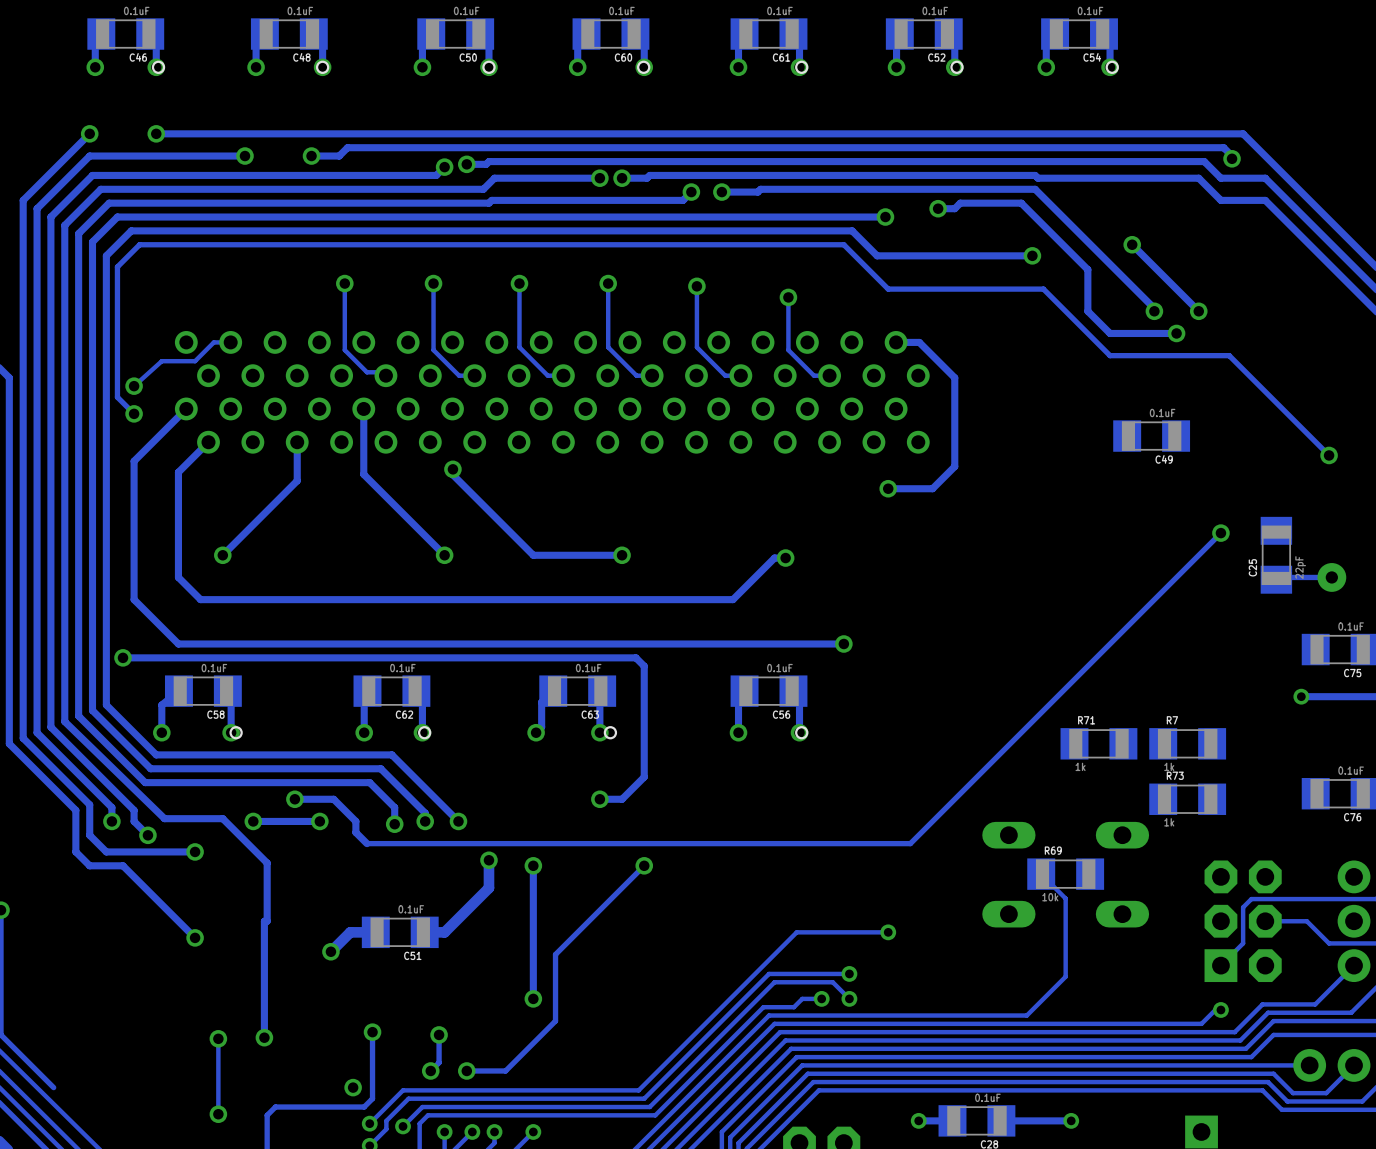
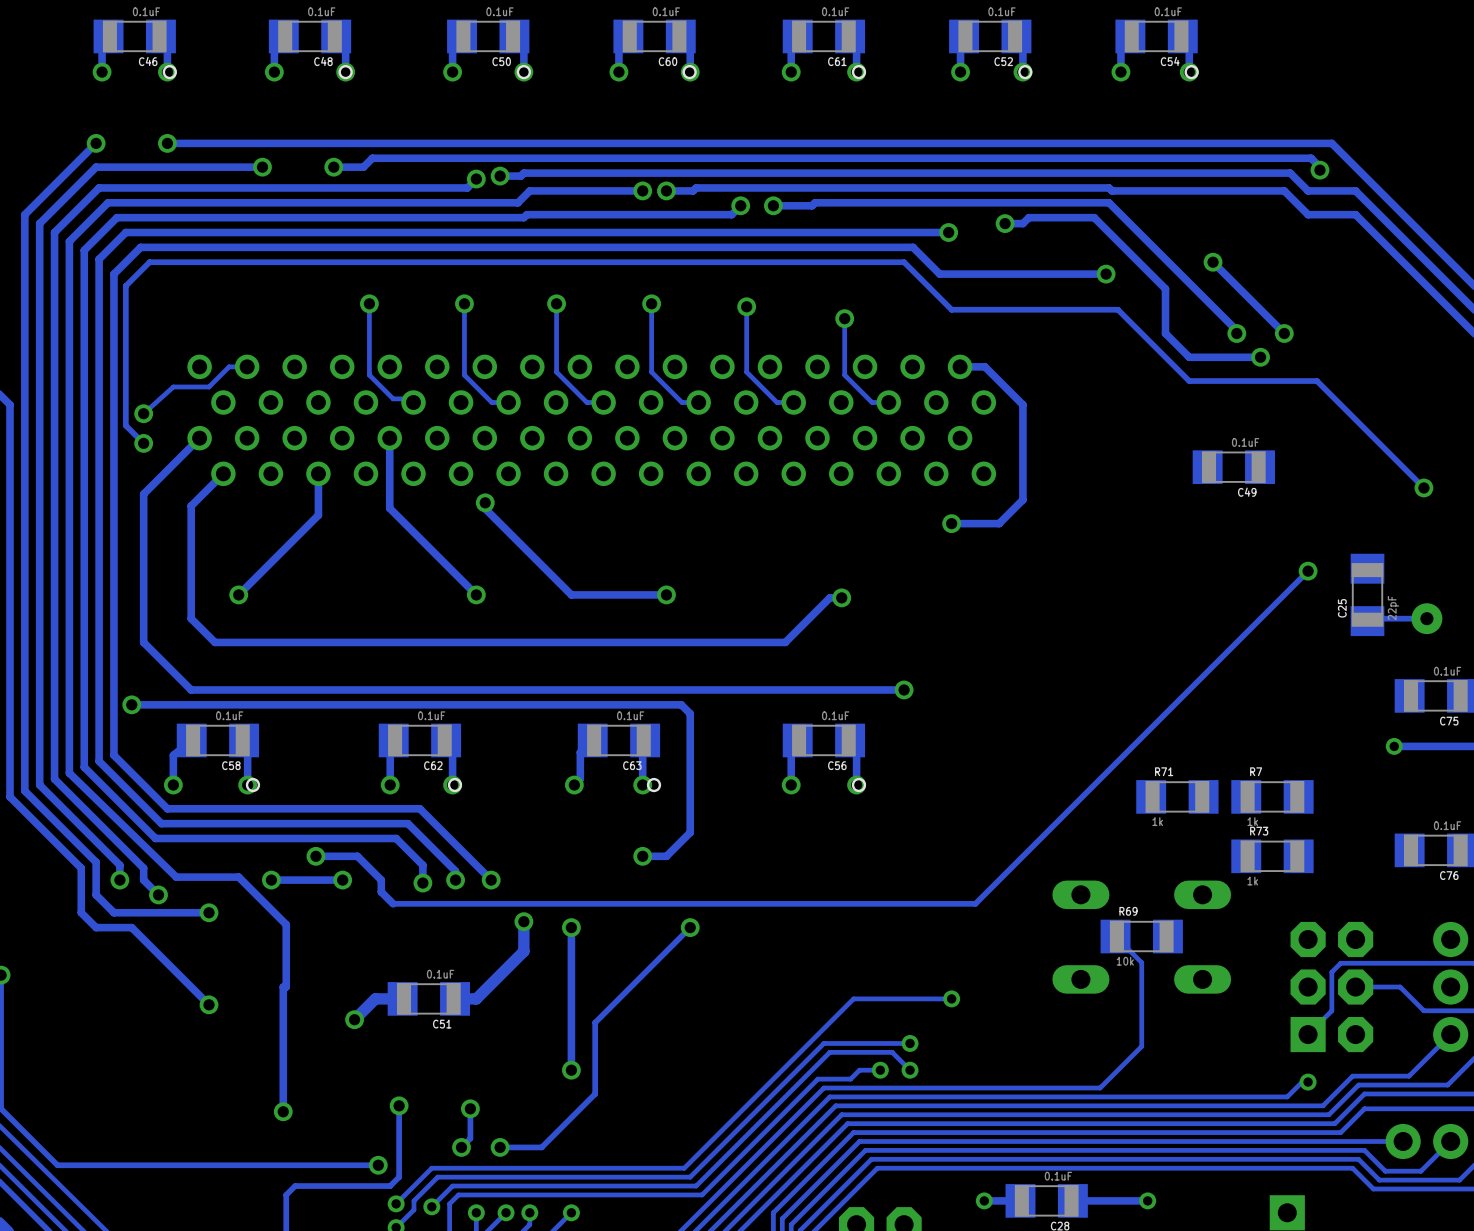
track: (218, 1038) (218, 1114) -> none
via: (218, 1038) -> none
track: none -> (378, 1165) (57, 1165)
via: (218, 1114) -> none

